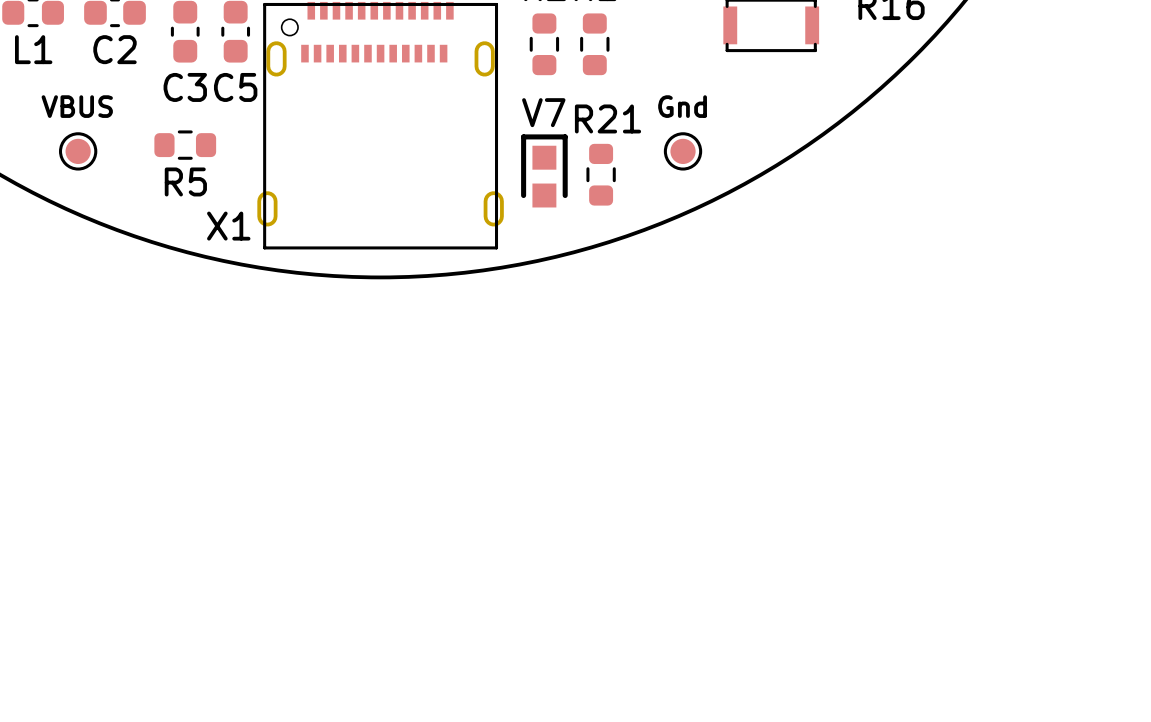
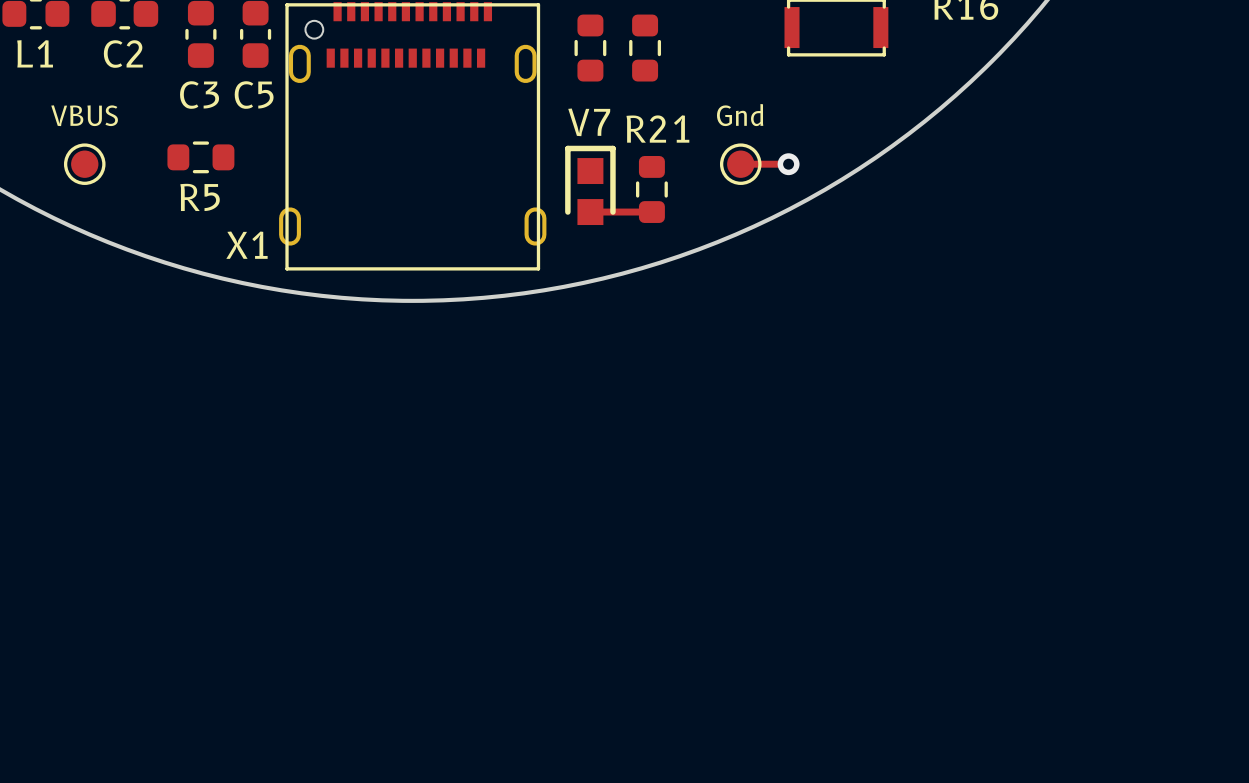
track: none -> (740, 164) (788, 164)
via: none -> (788, 164)
track: none -> (590, 212) (651, 212)

